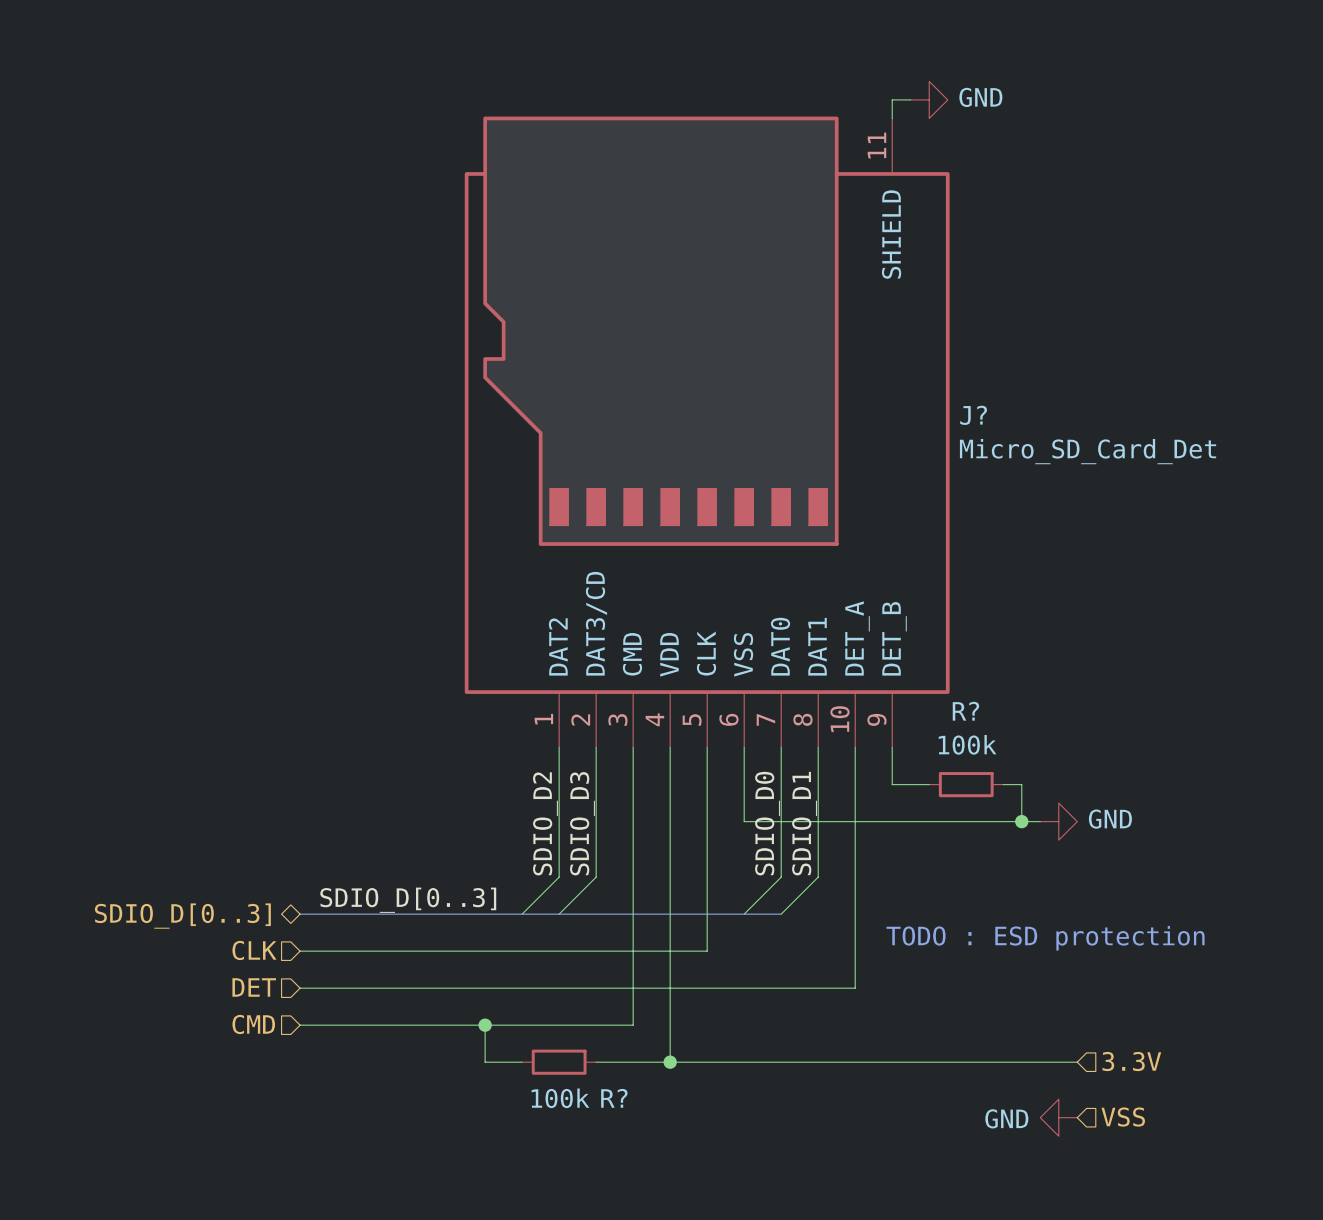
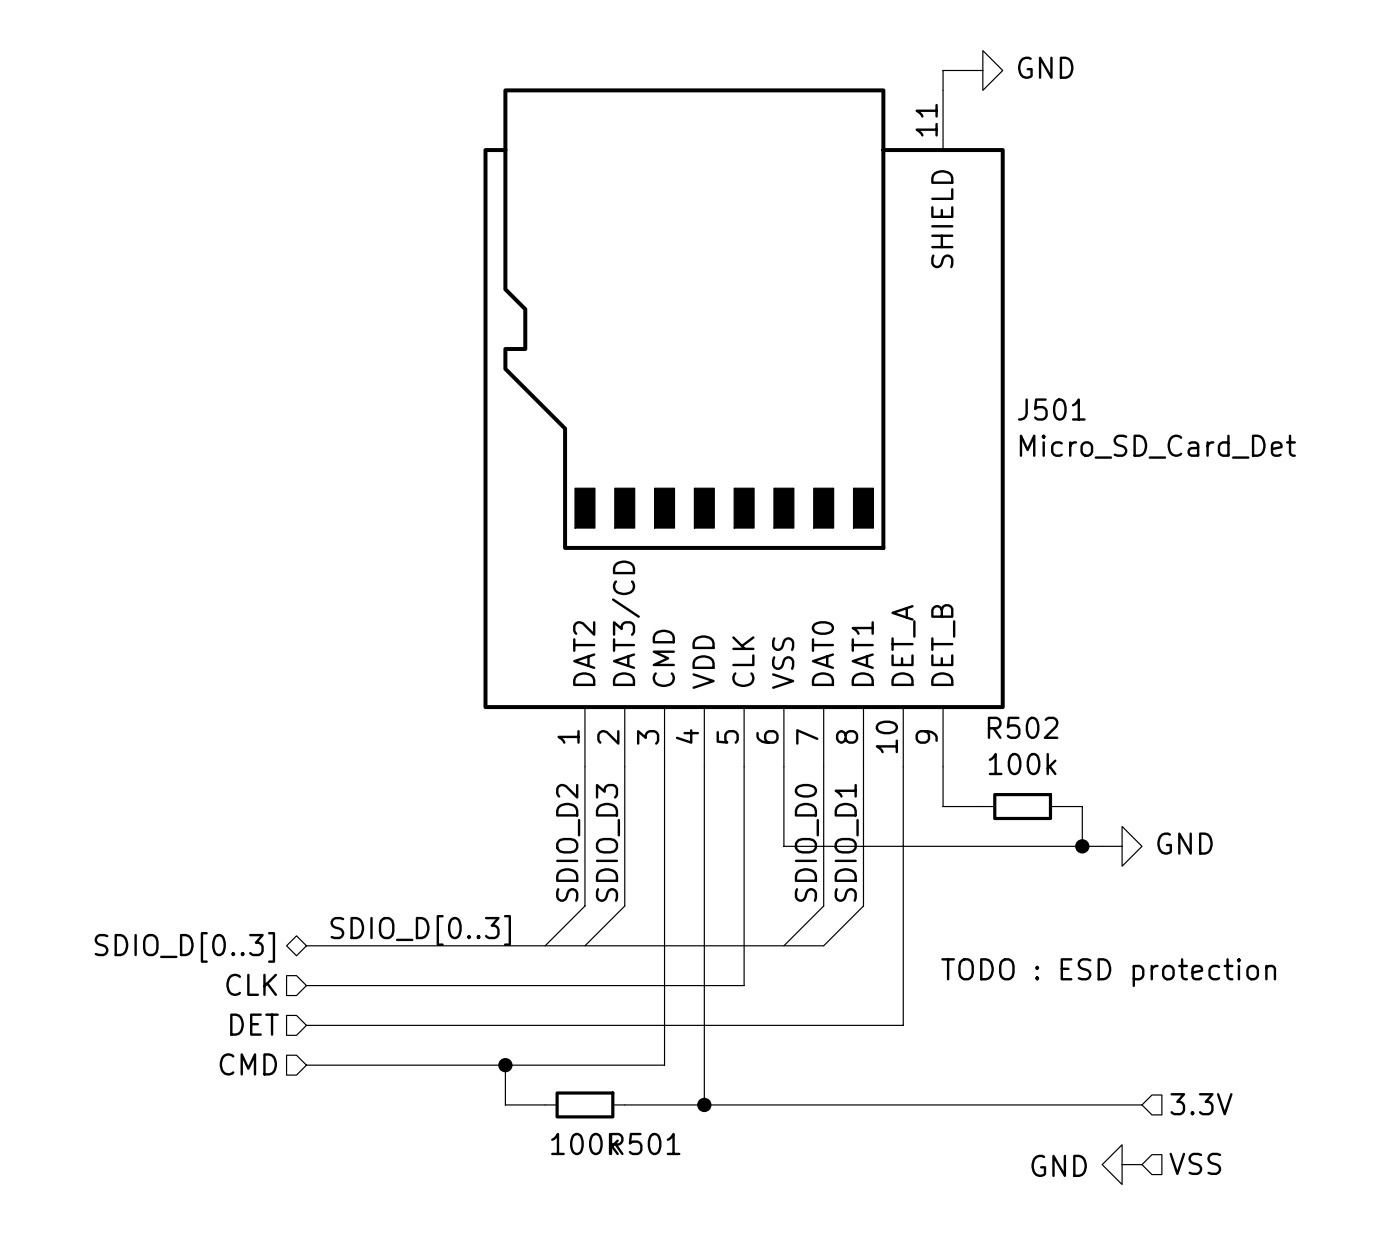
J? name: J? (973, 415) -> J501 (1051, 409)
R? name: R? (965, 711) -> R502 (1023, 727)
R? name: R? (614, 1098) -> R501 (645, 1143)

